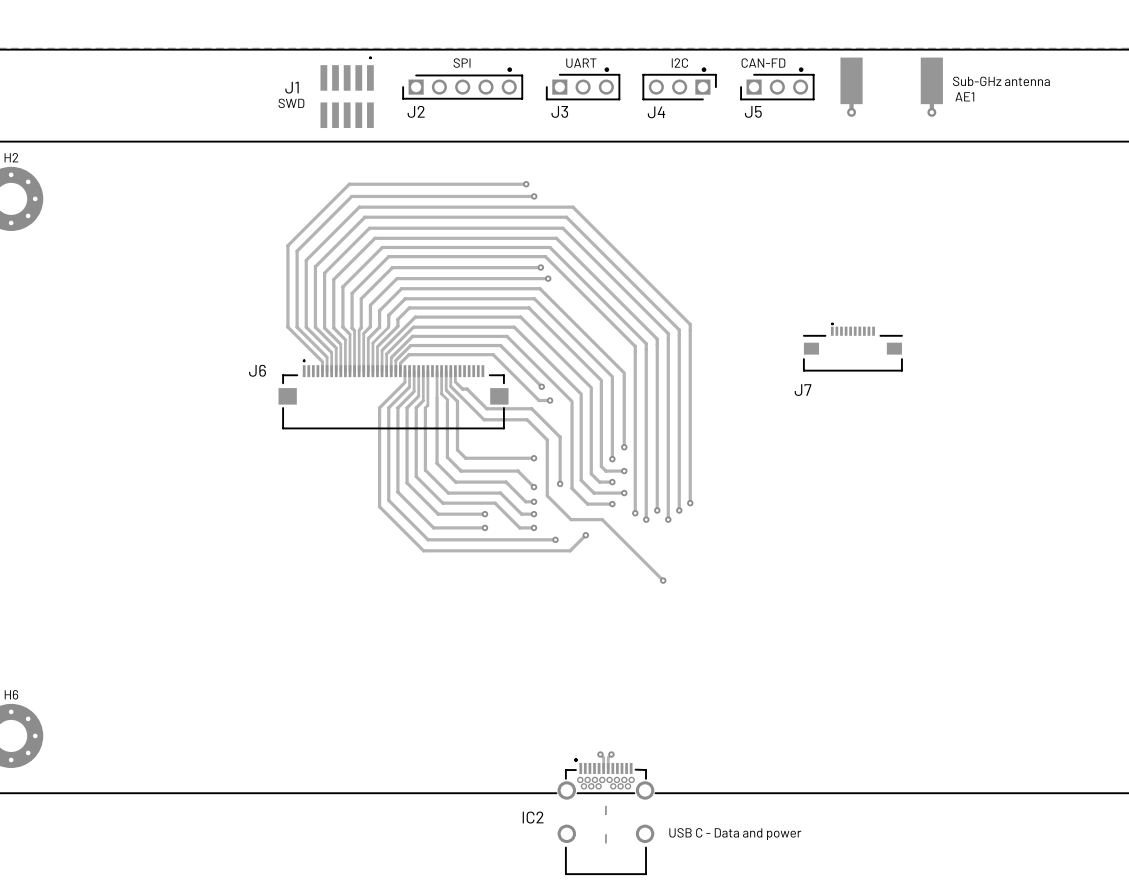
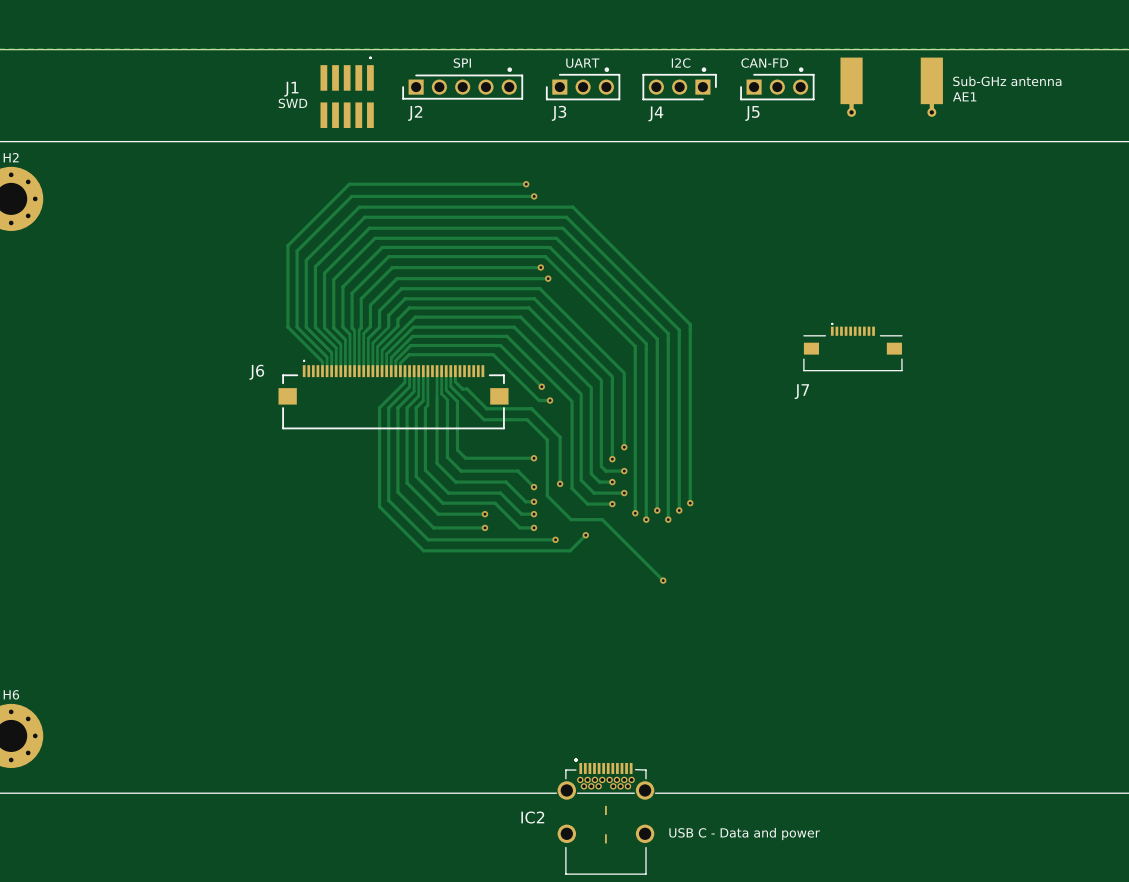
track: (600, 754) (603, 757) (603, 768) -> none
via: (600, 754) -> none
track: (611, 754) (608, 757) (608, 768) -> none
via: (611, 754) -> none

